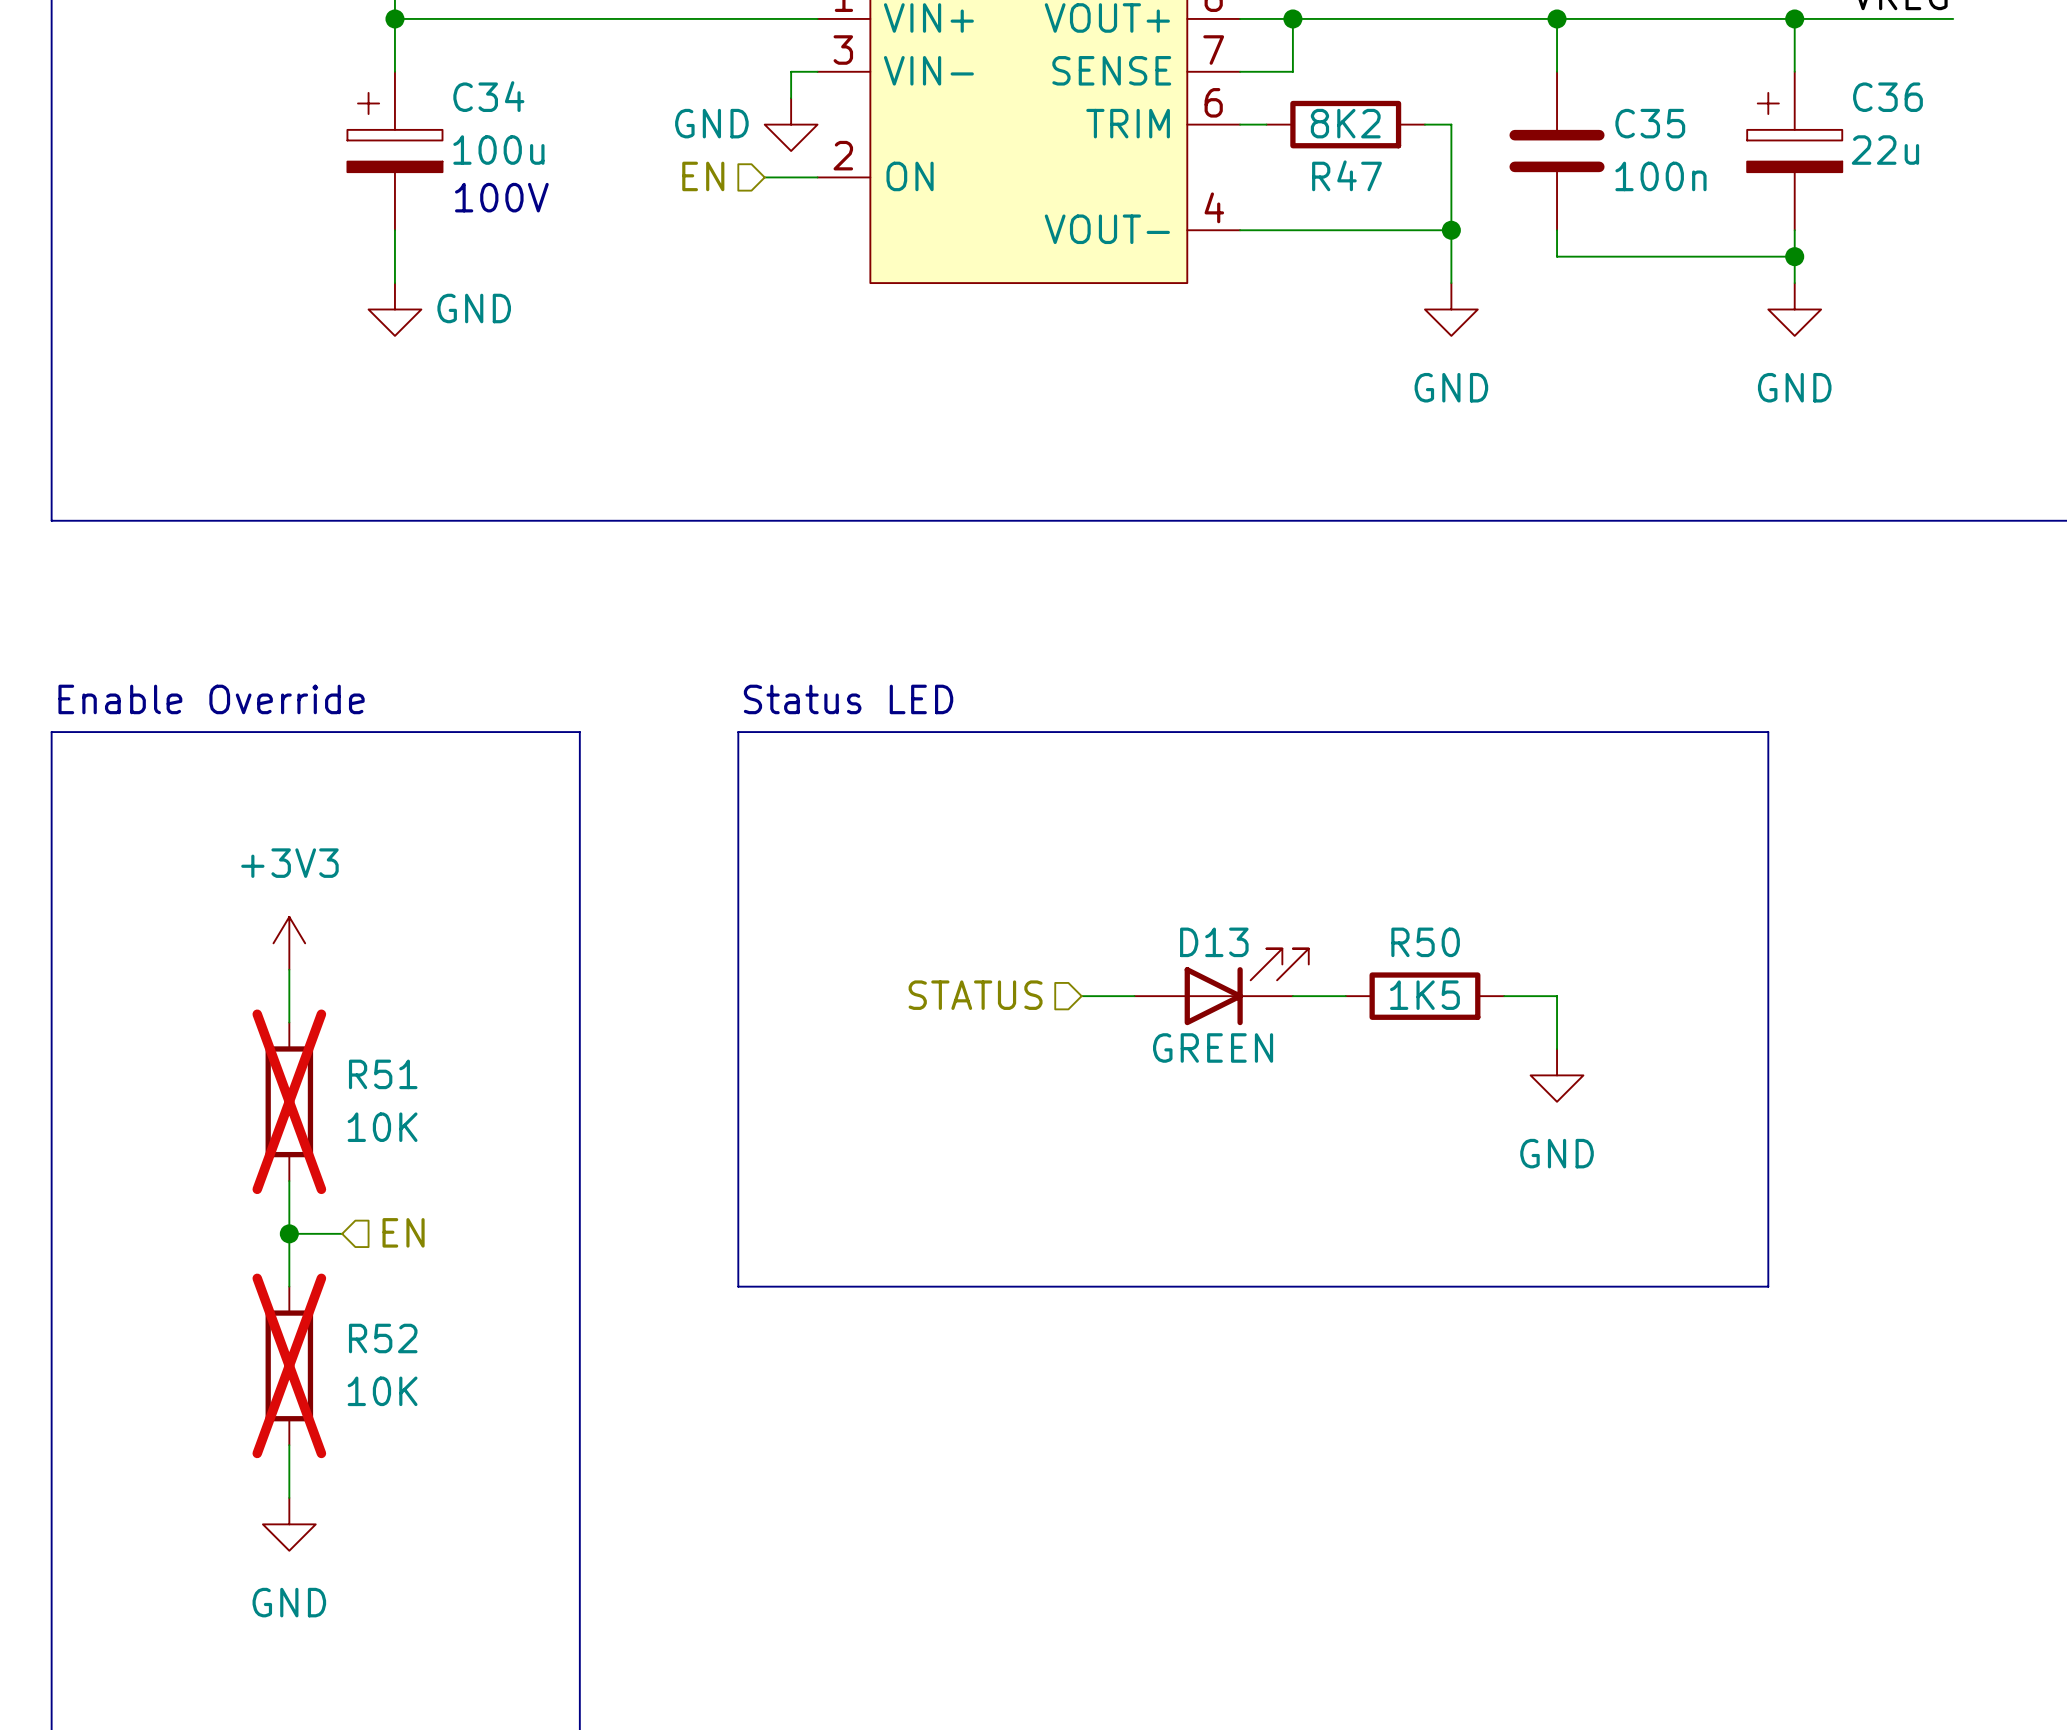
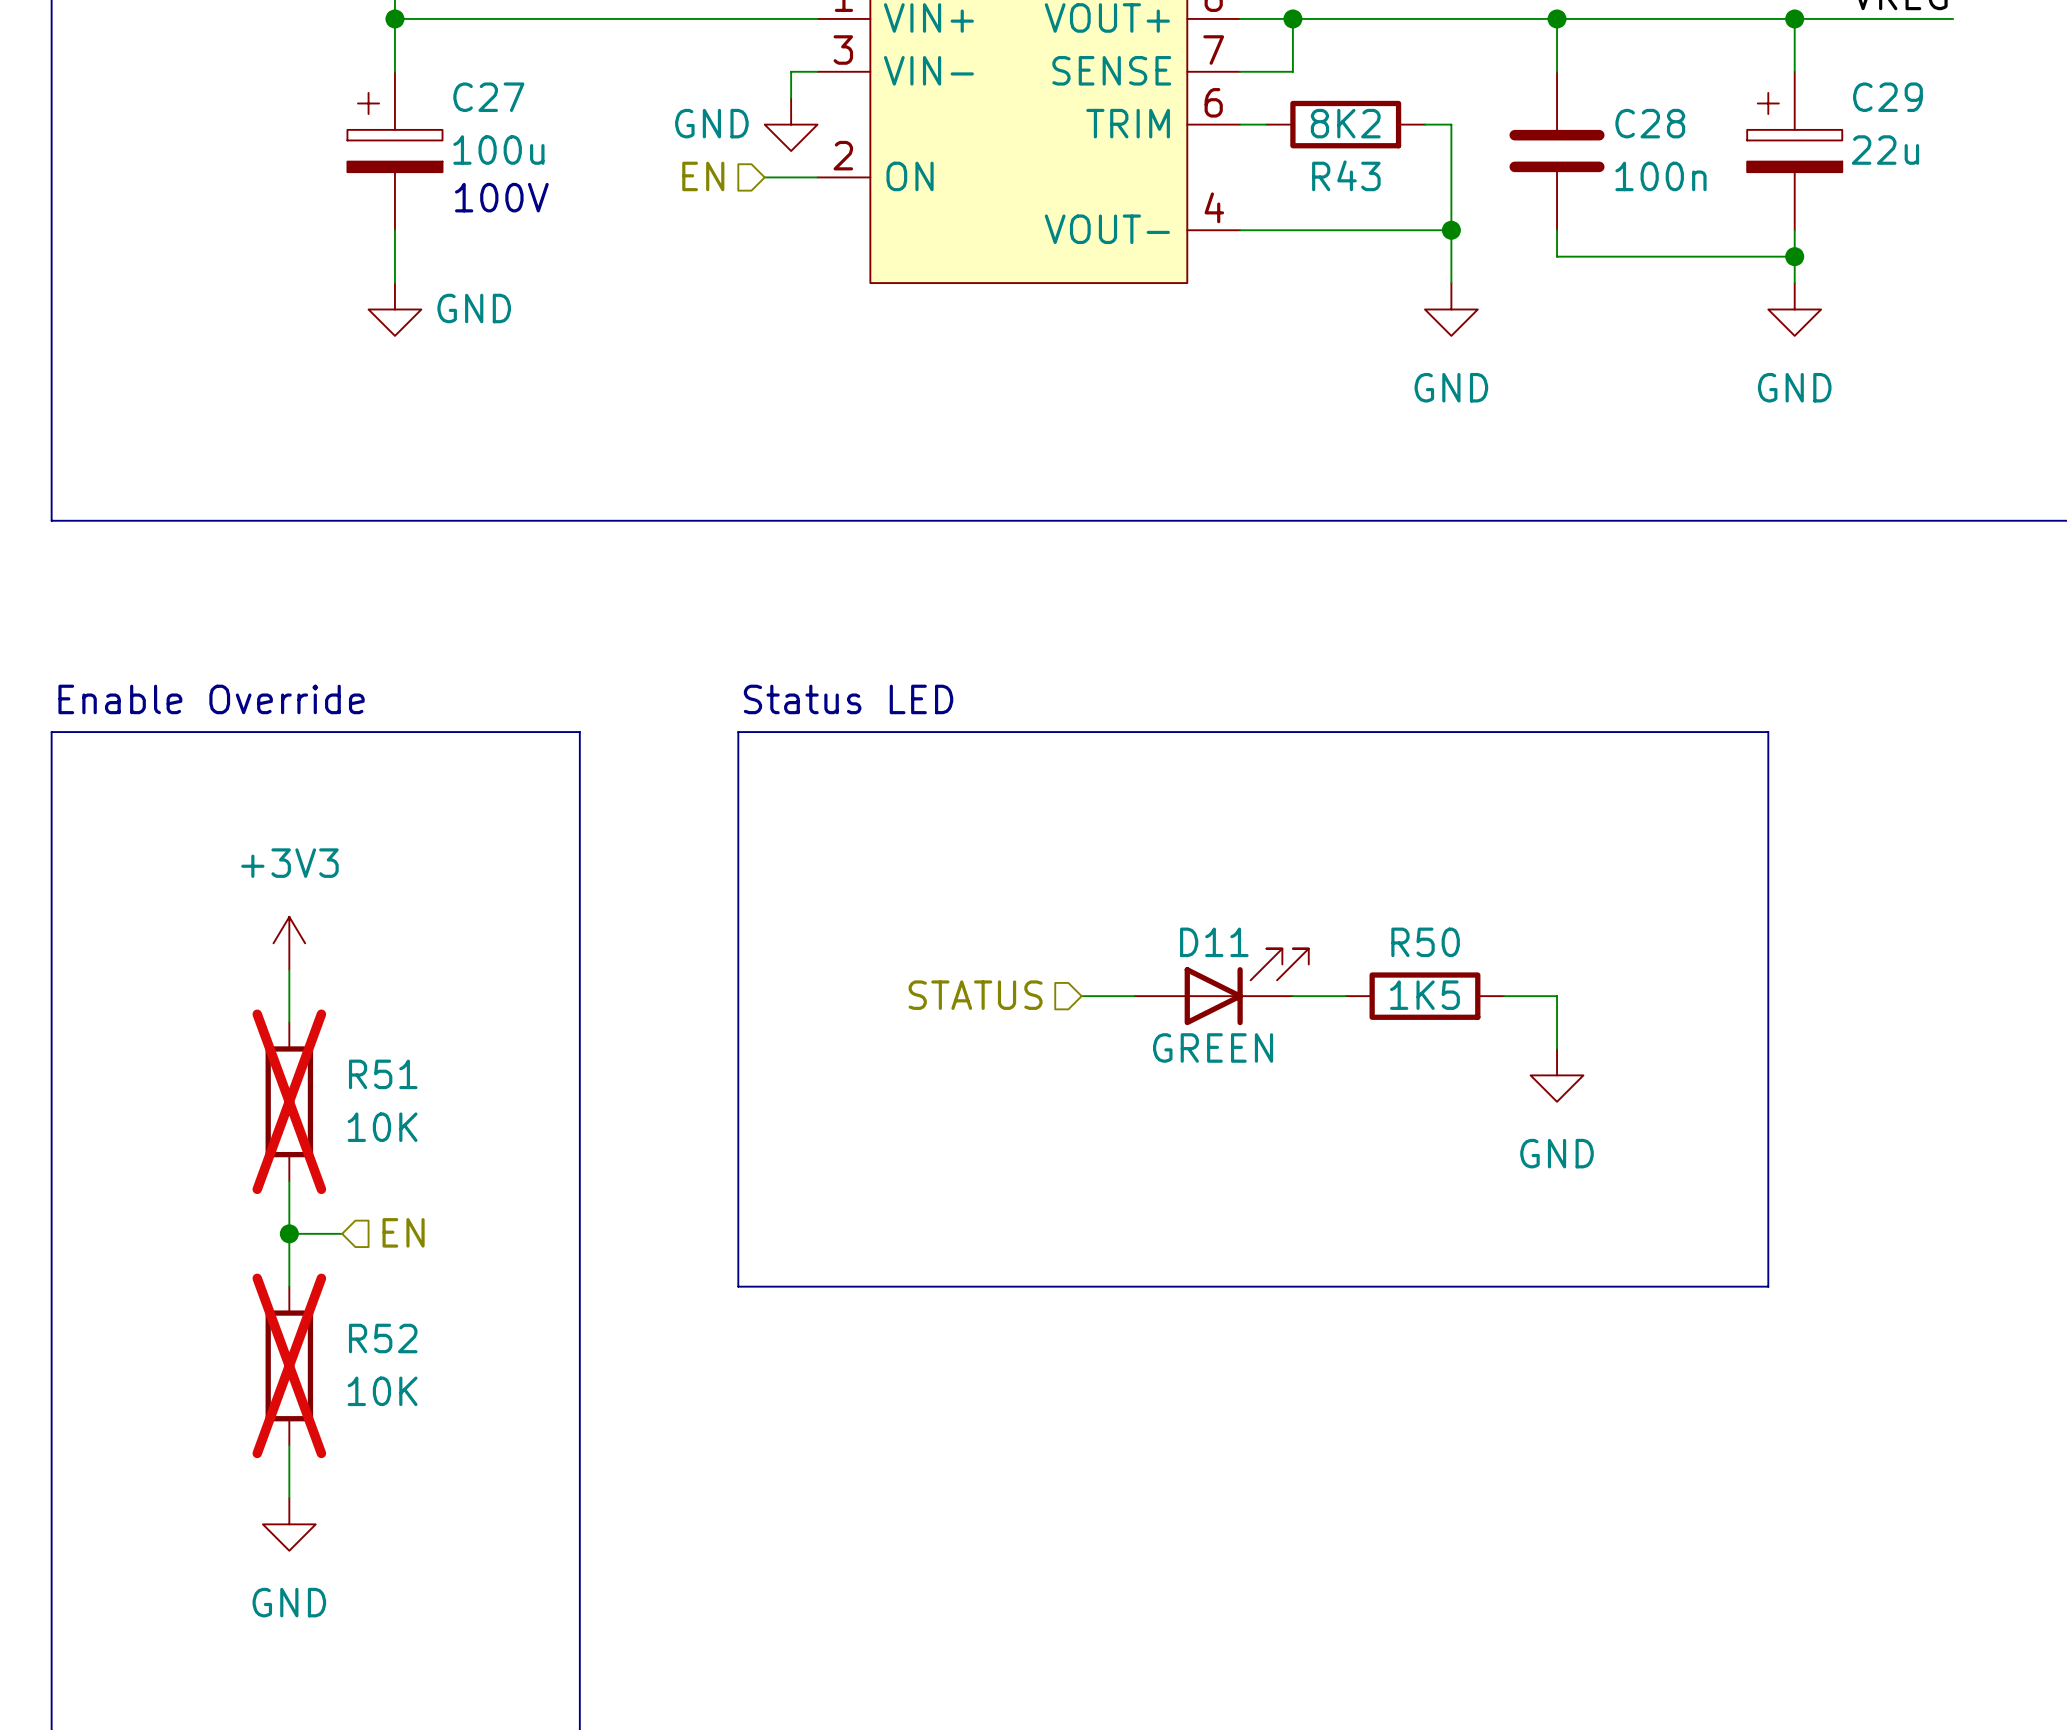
C34 name: C34 (488, 96) -> C27 (488, 97)
C36 name: C36 (1887, 97) -> C29 (1887, 97)
C35 name: C35 (1650, 123) -> C28 (1650, 123)
R47 name: R47 (1347, 175) -> R43 (1346, 175)
D13 name: D13 (1214, 942) -> D11 (1214, 942)

